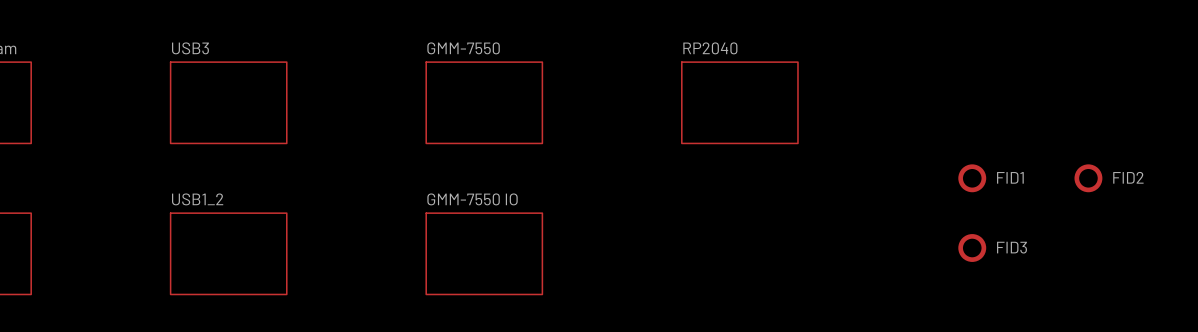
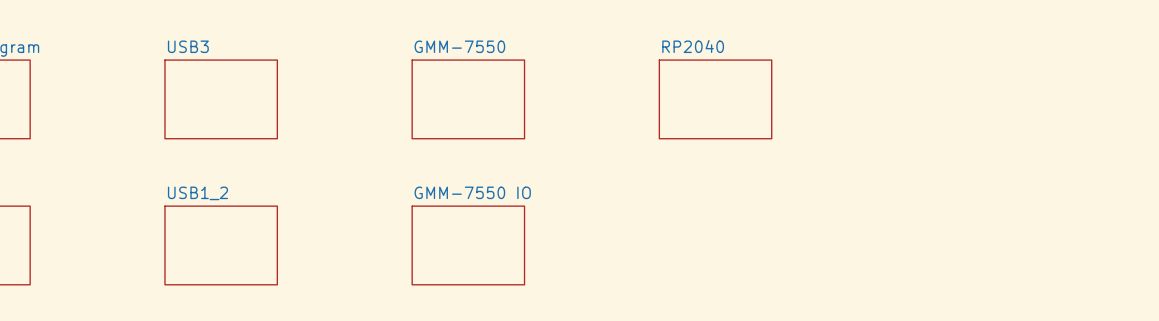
FID1: (972, 178) -> none
FID2: (1088, 178) -> none
FID3: (972, 248) -> none

